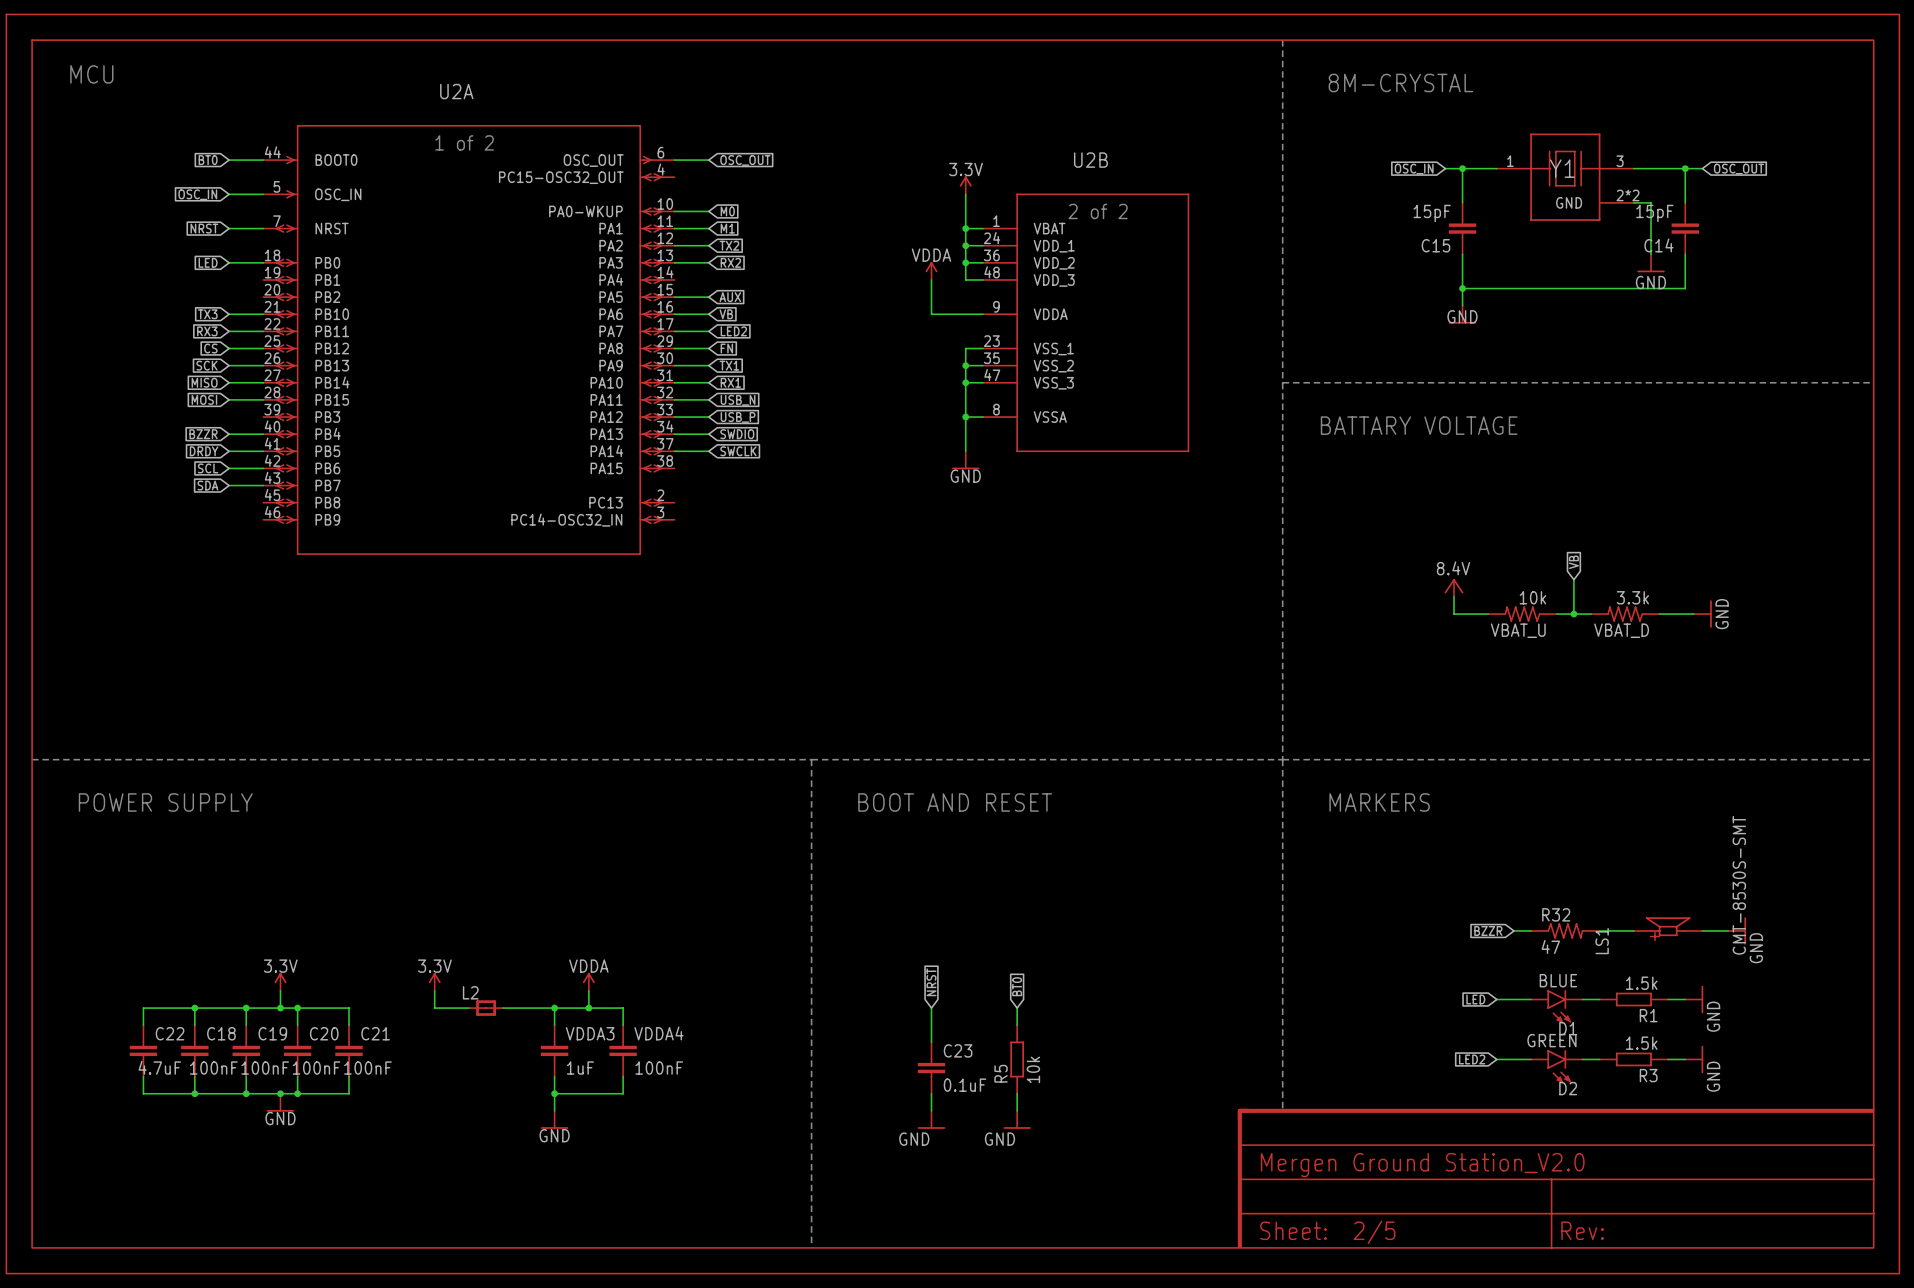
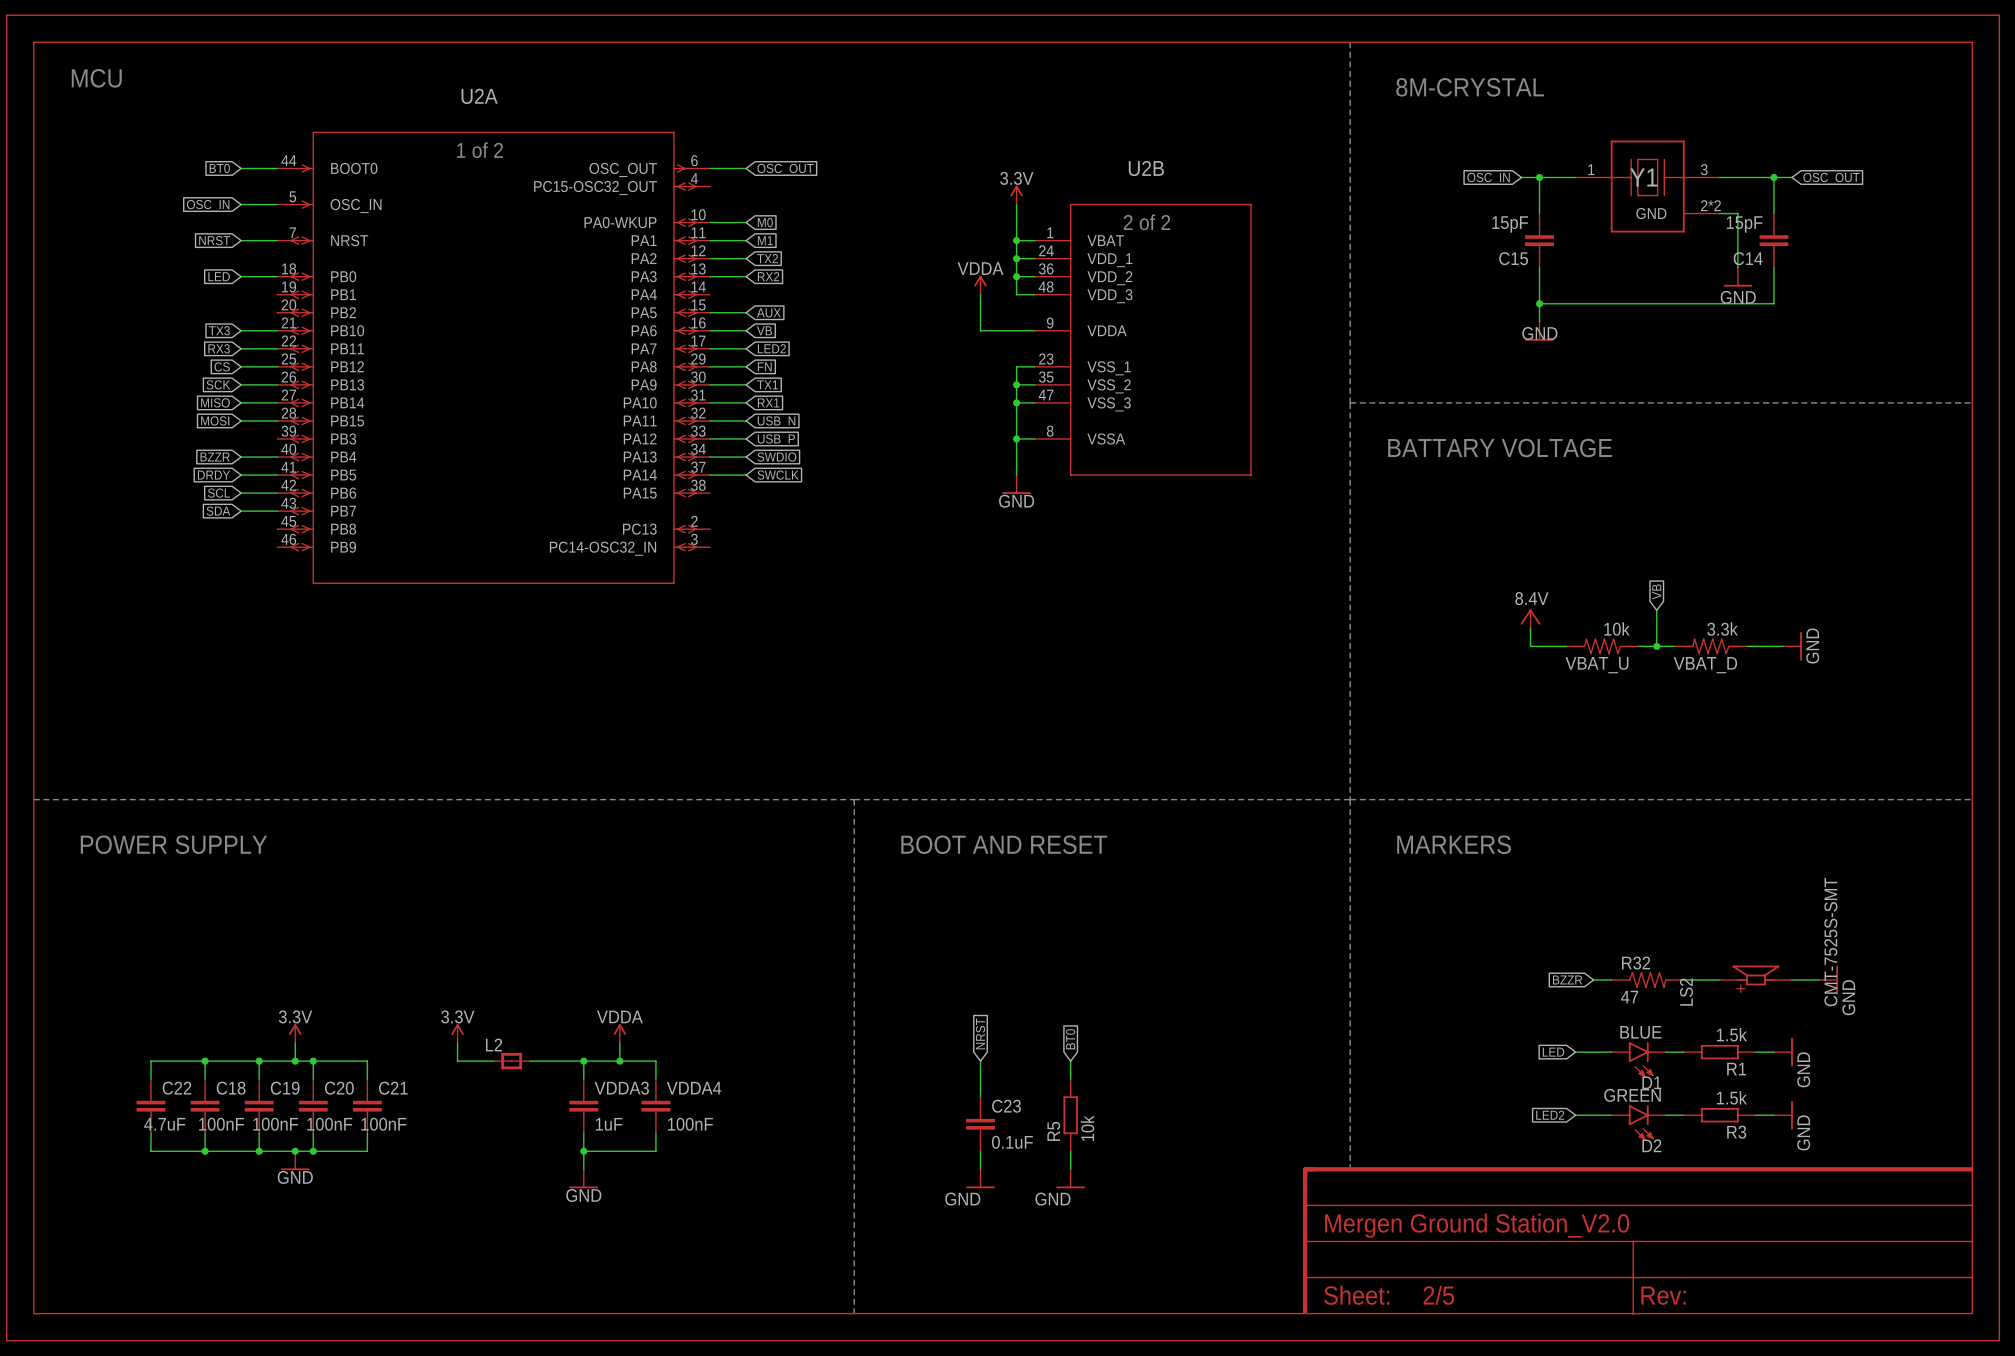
LS1 value: CMT-8530S-SMT (1739, 885) -> CMT-7525S-SMT (1830, 942)
LS1 name: LS1 (1602, 941) -> LS2 (1686, 992)

